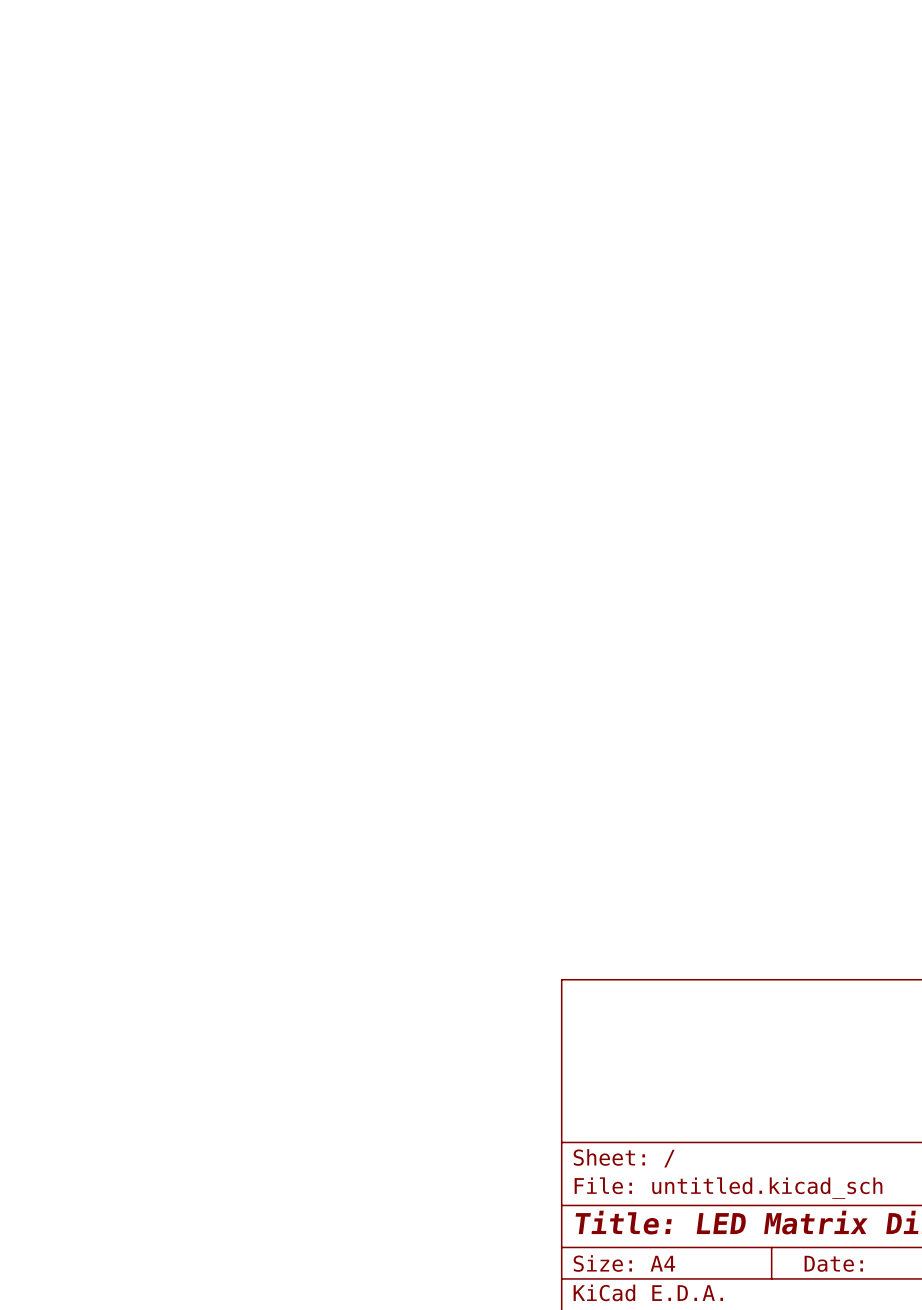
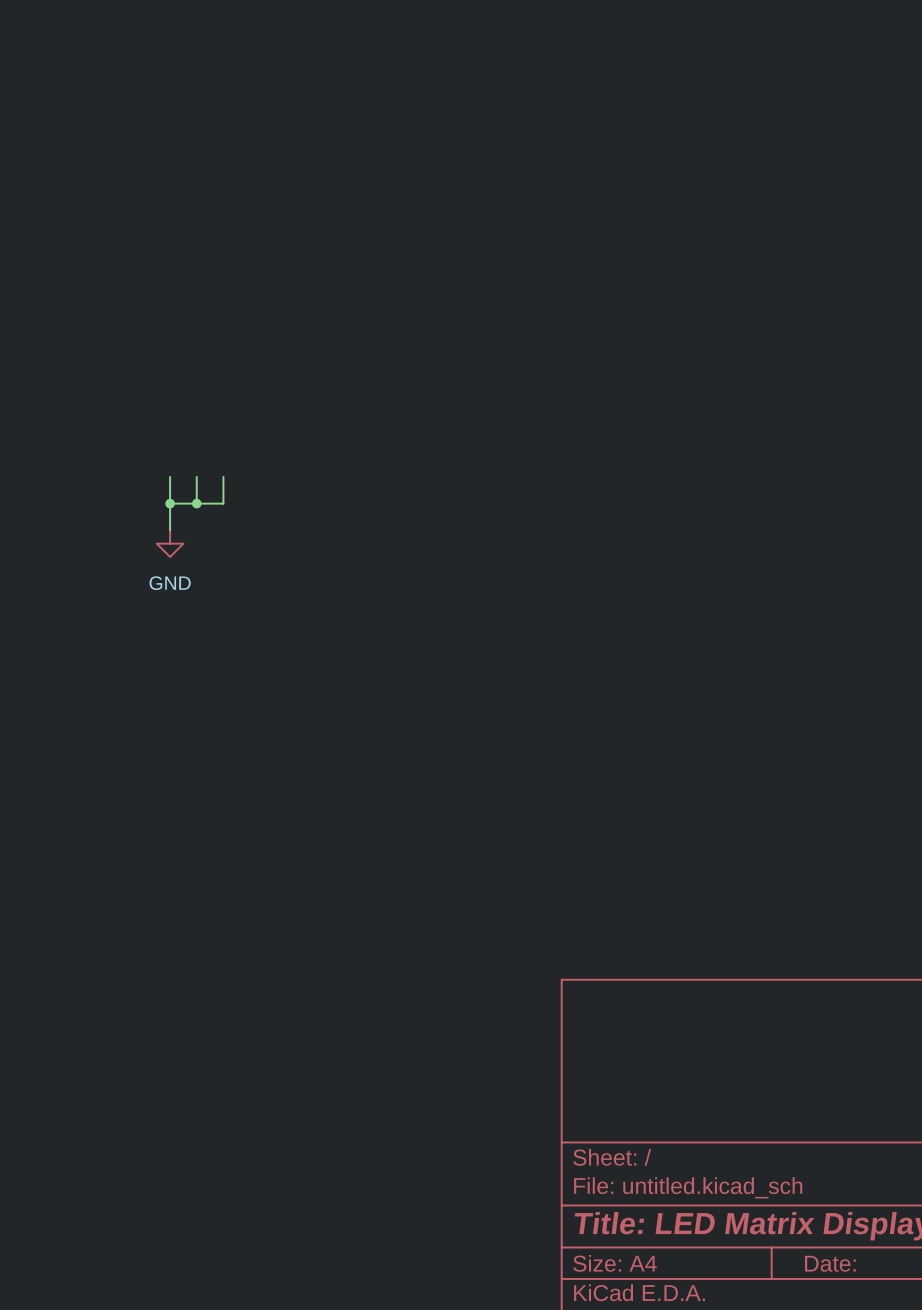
wire: none -> (170, 476) (170, 530)
wire: none -> (196, 476) (196, 503)
wire: none -> (223, 476) (223, 503) (170, 503)
junction: none -> (170, 503)
junction: none -> (196, 503)
power symbol: none -> GND (170, 543)

